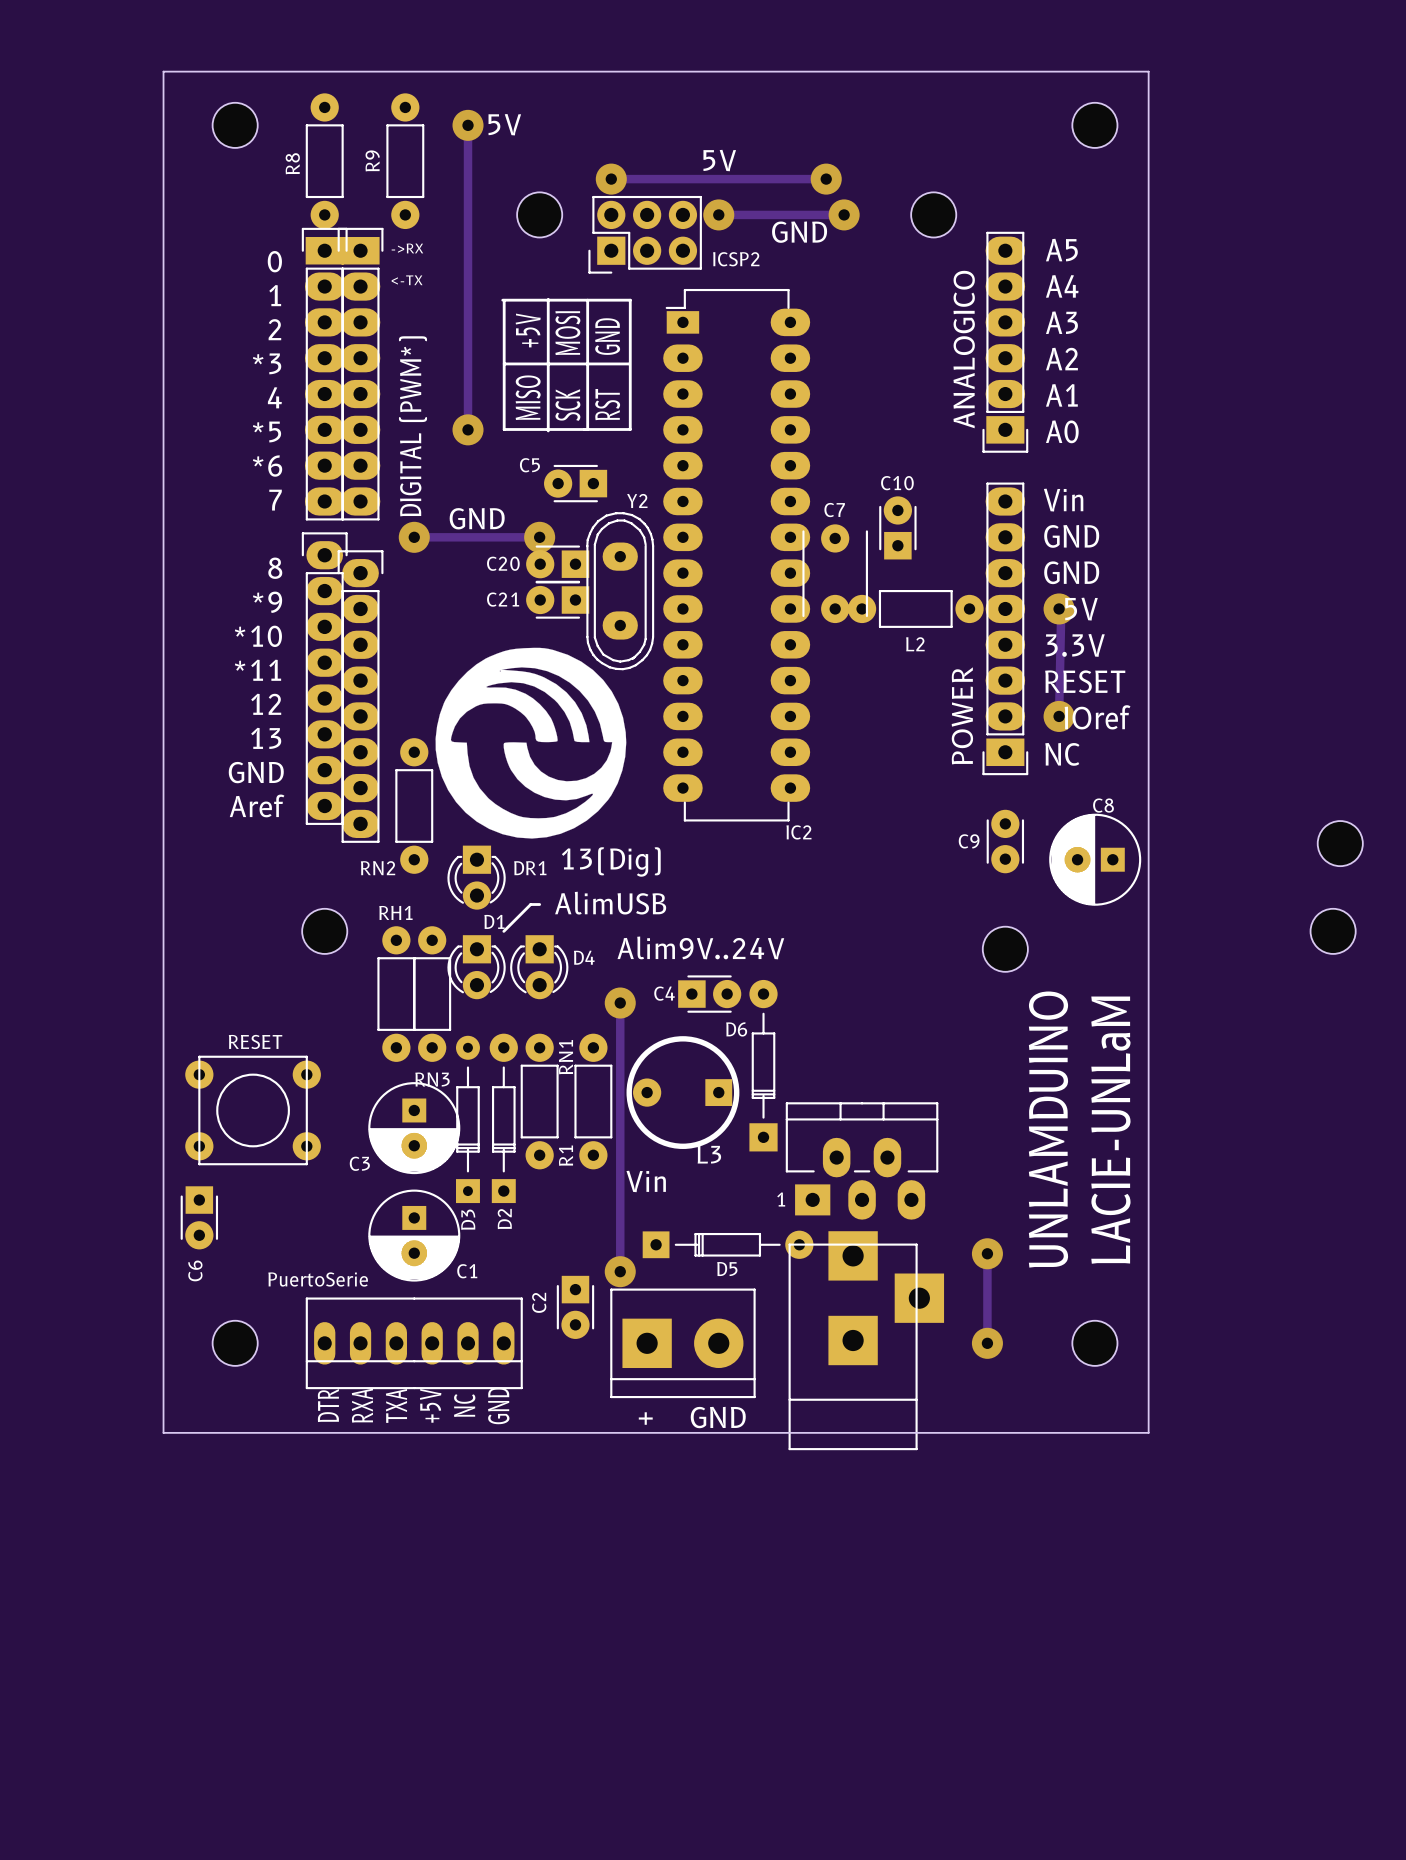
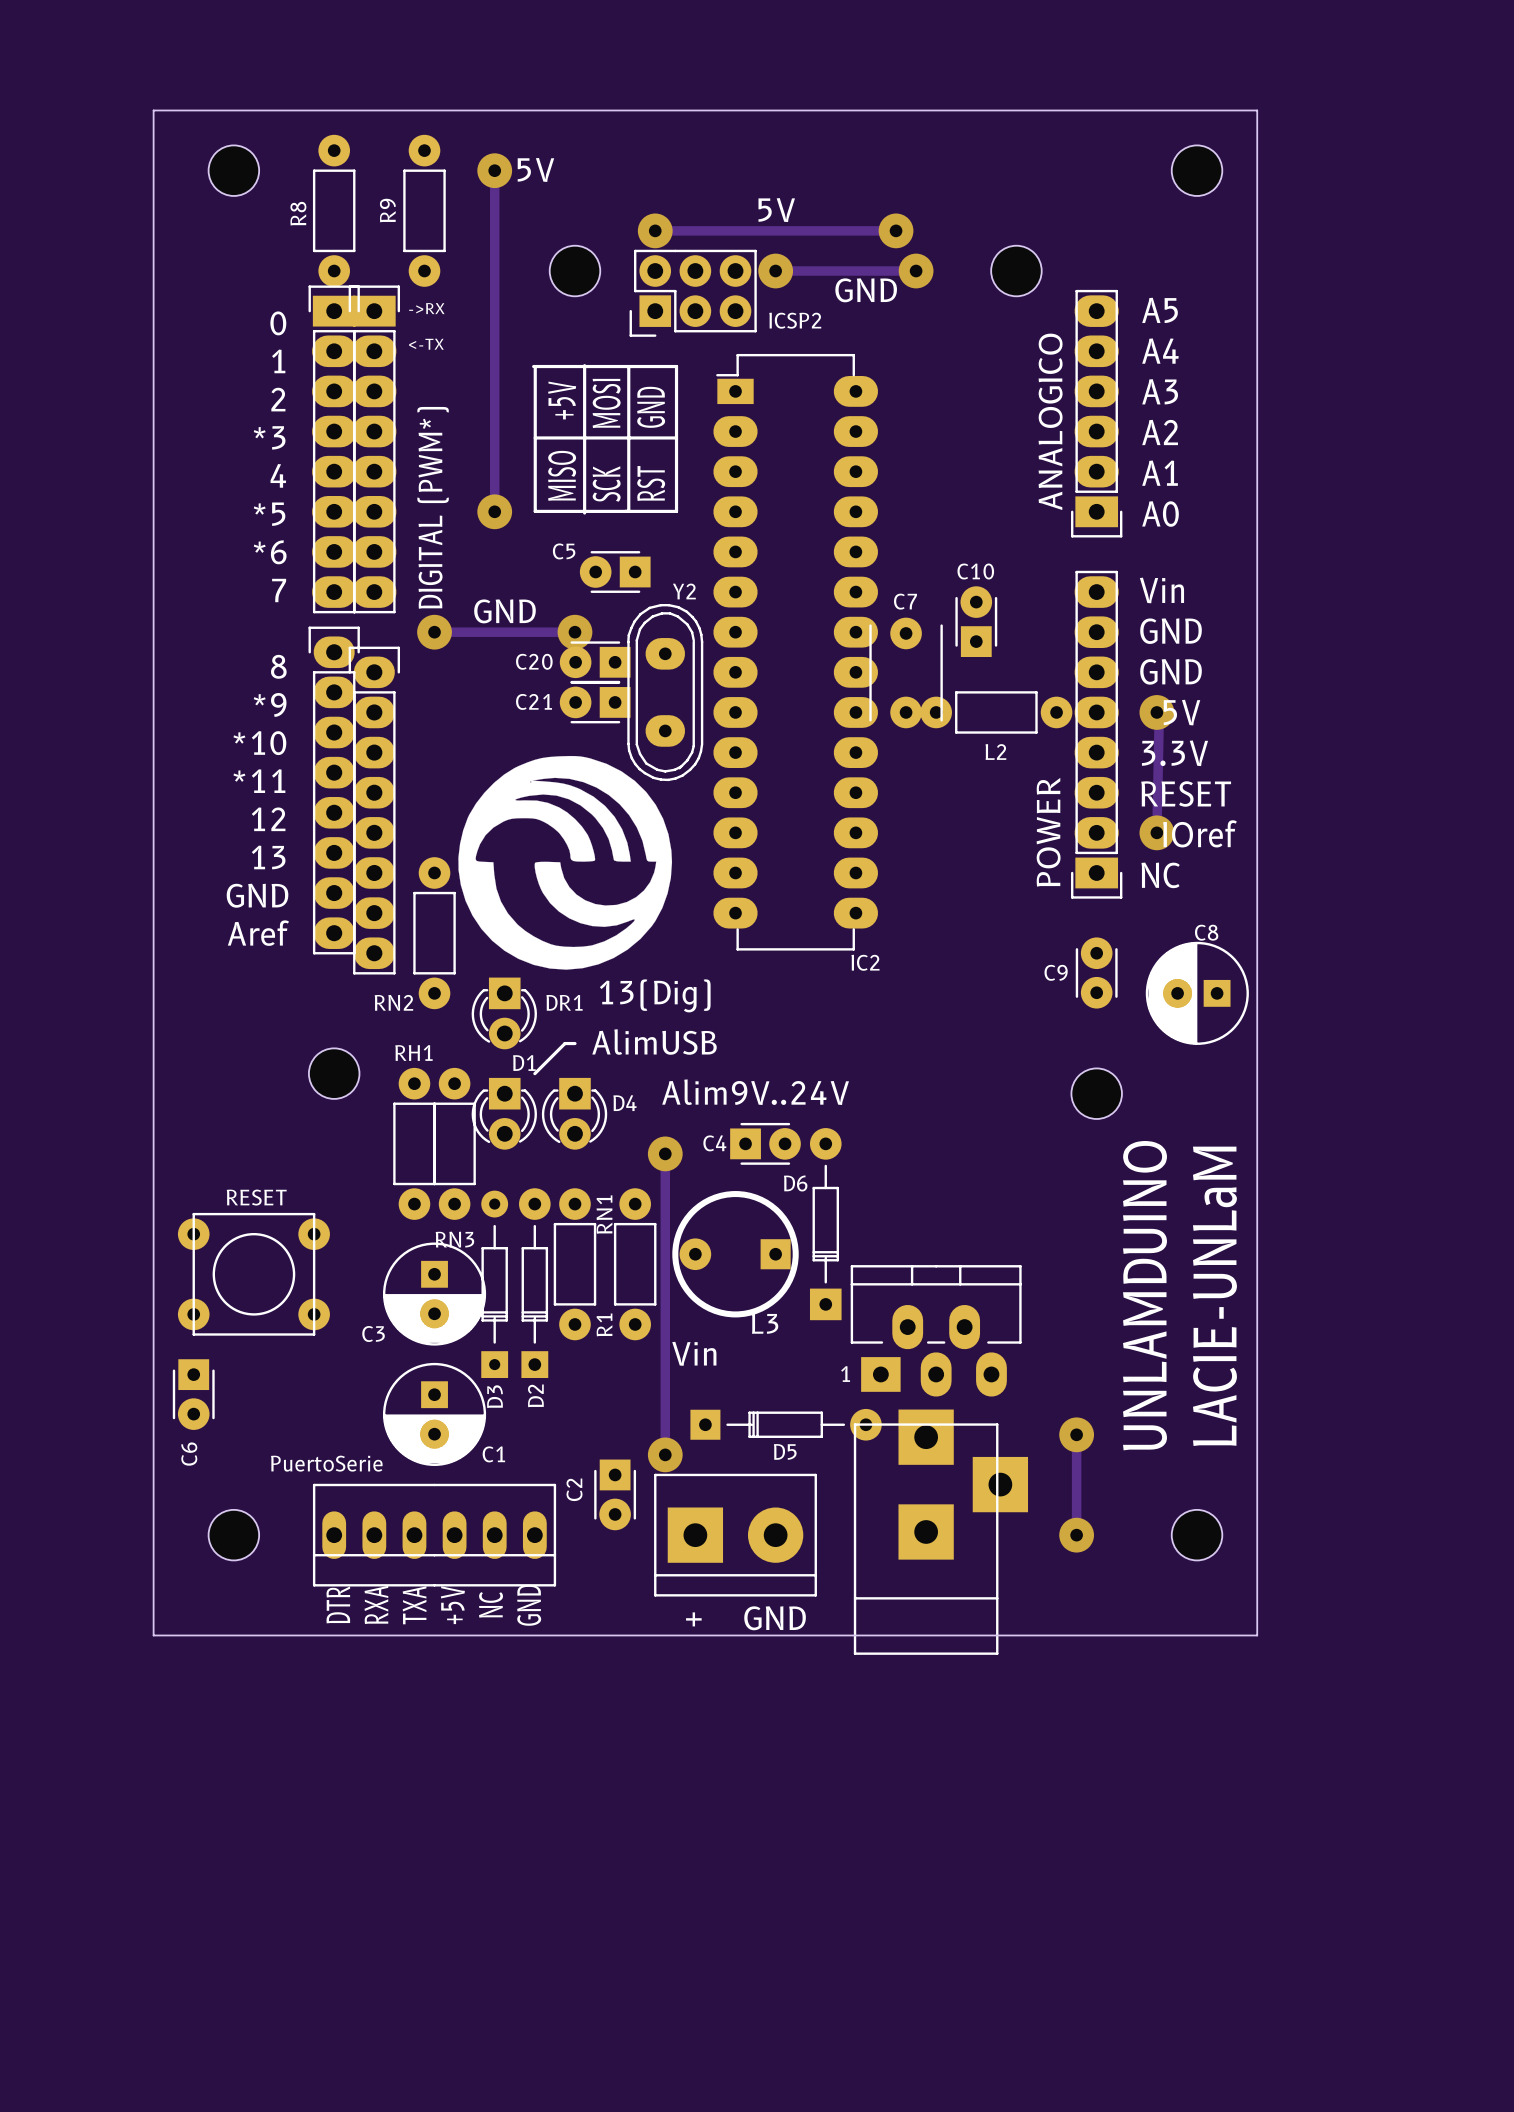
part: (1340, 843) -> none
part: (1333, 931) -> none

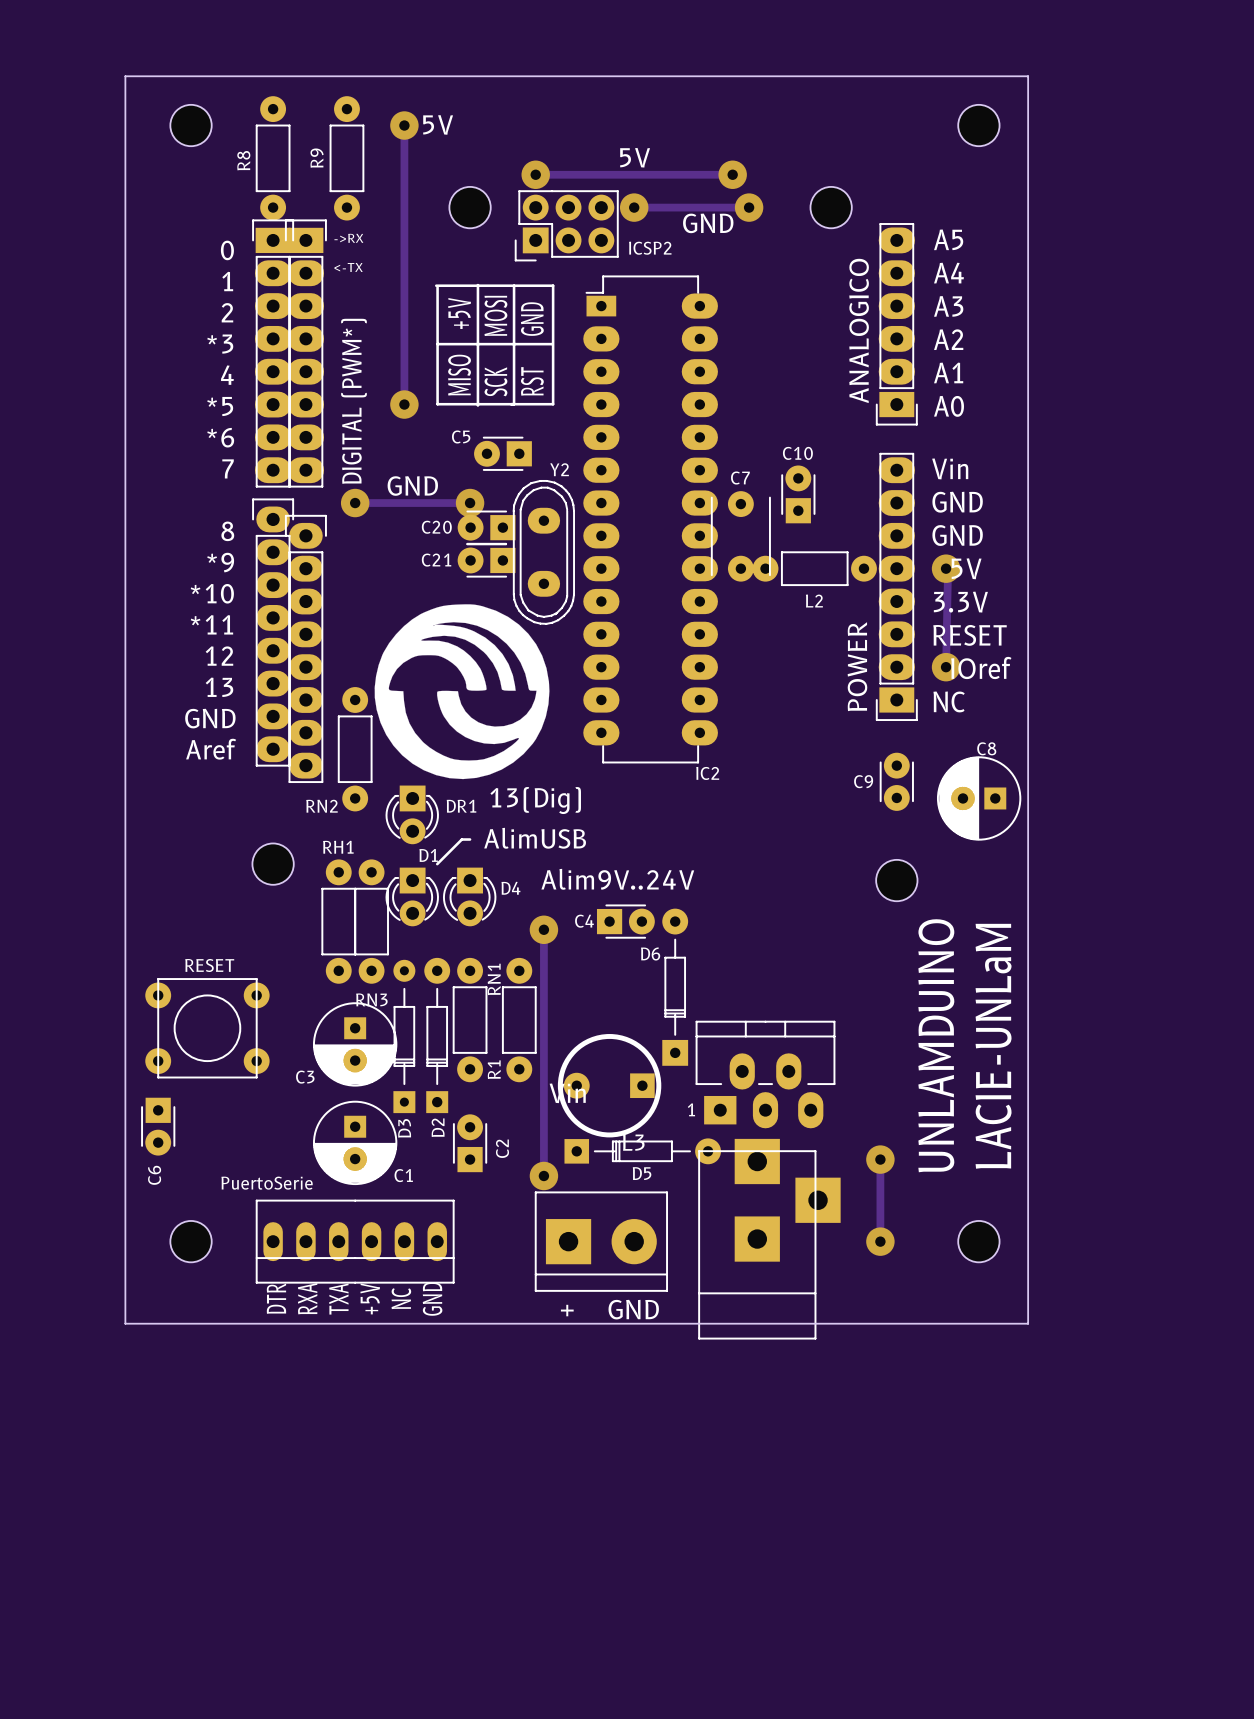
L3 position: (735, 1254) -> (609, 1085)
C2 rotation: 0° (615, 1494) -> 180° (470, 1143)
C2 position: (615, 1494) -> (470, 1143)

